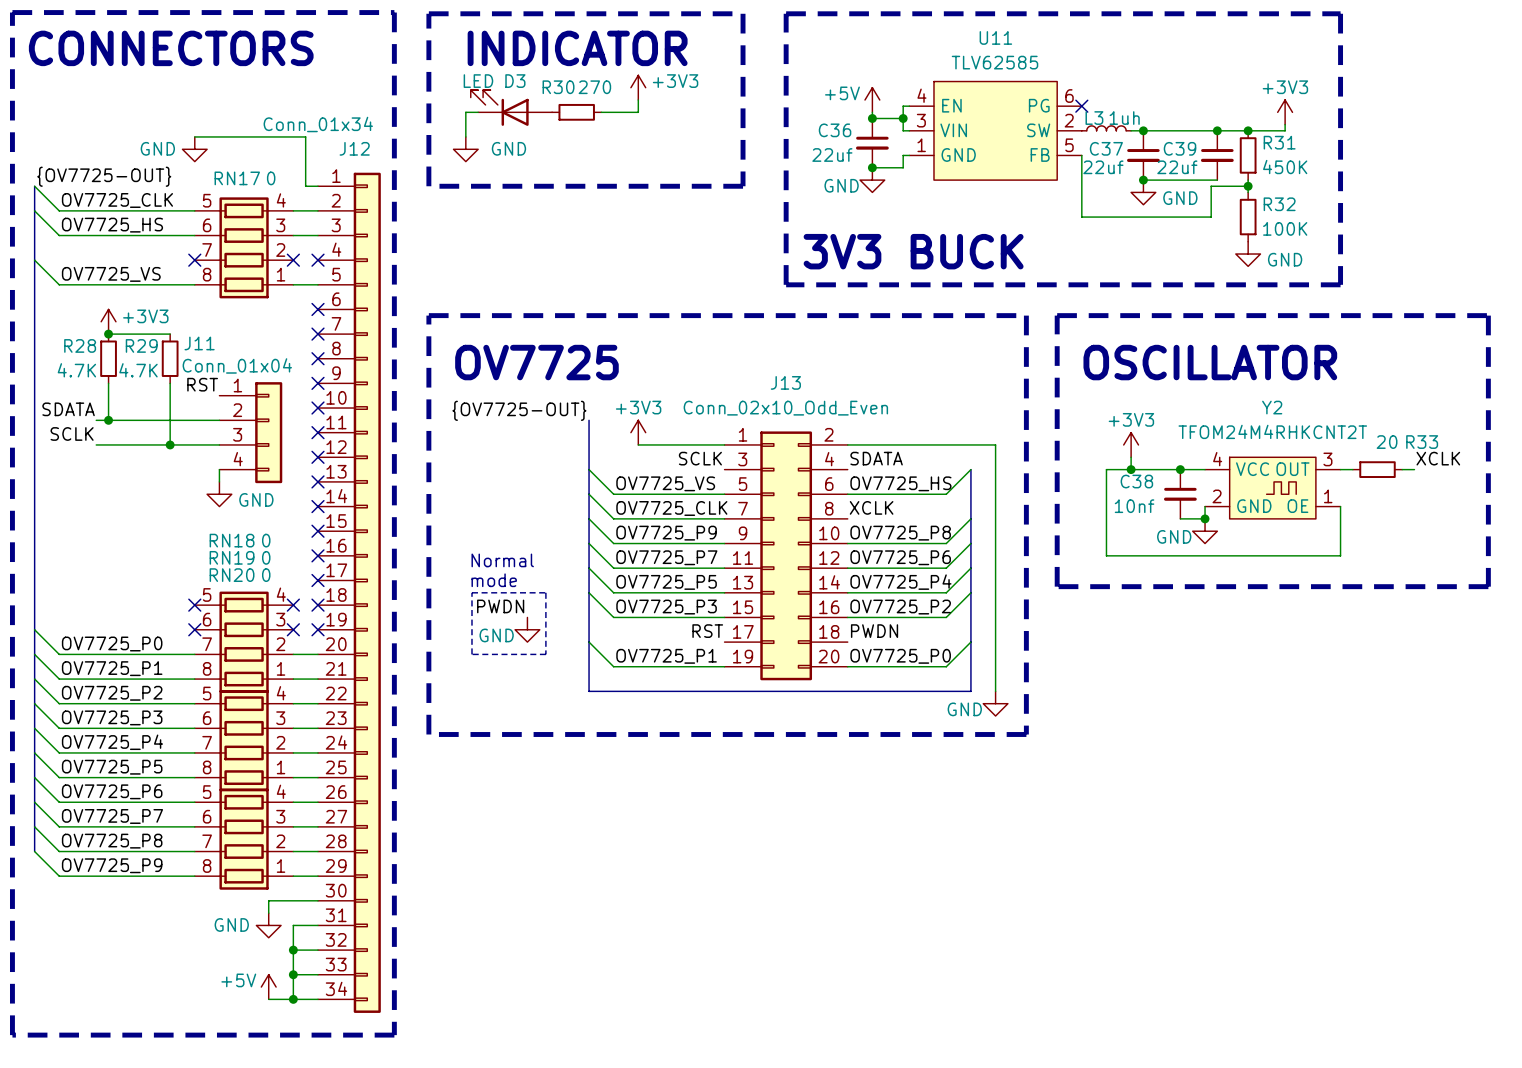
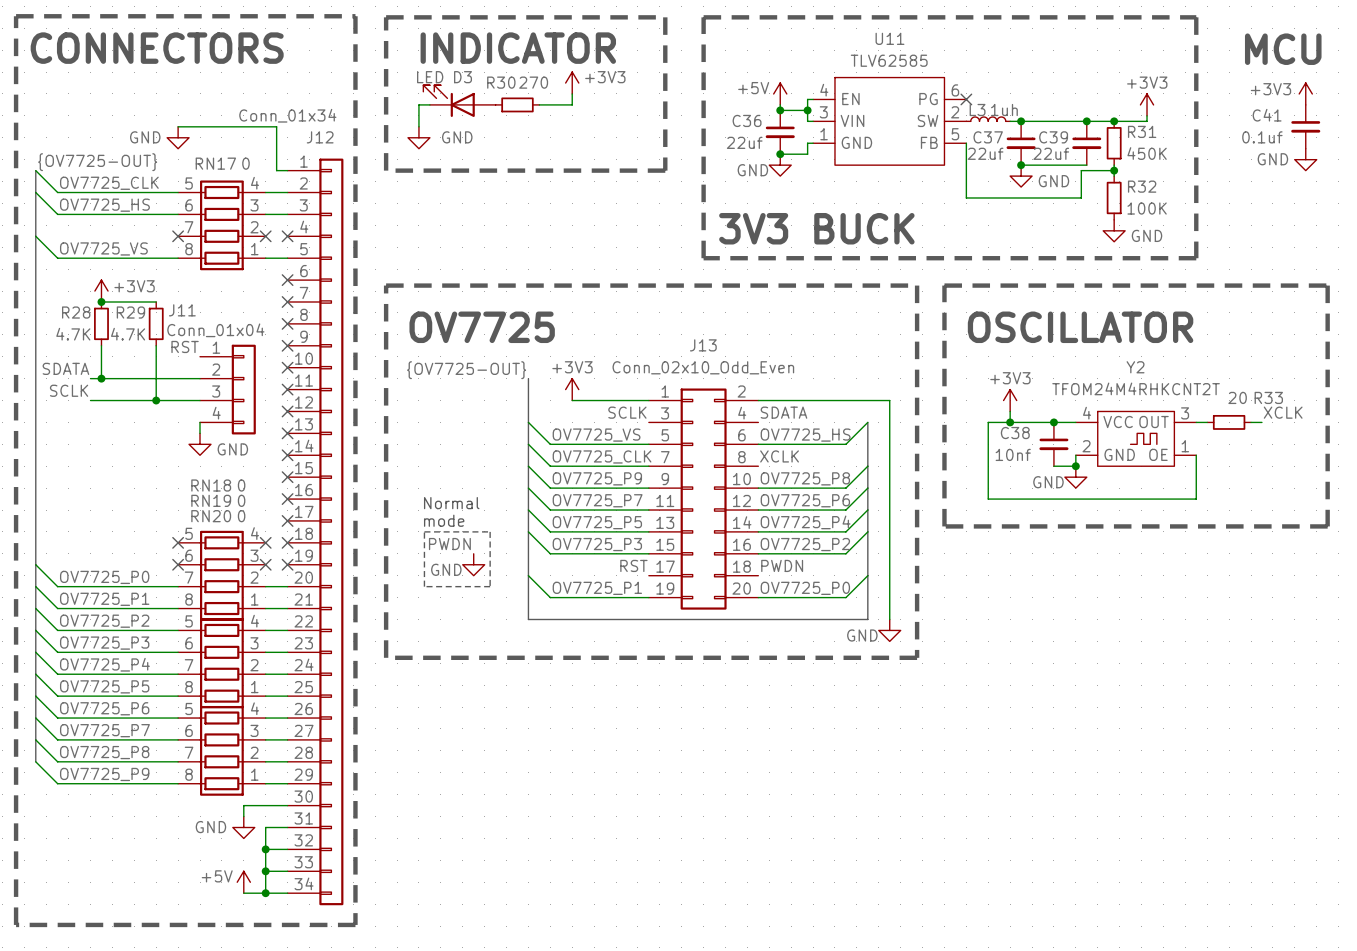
text: none -> MCU (1283, 49)
power symbol: none -> +3V3 (1305, 93)
C41: none -> 0.1uf (1305, 126)
power symbol: none -> GND (1305, 159)

